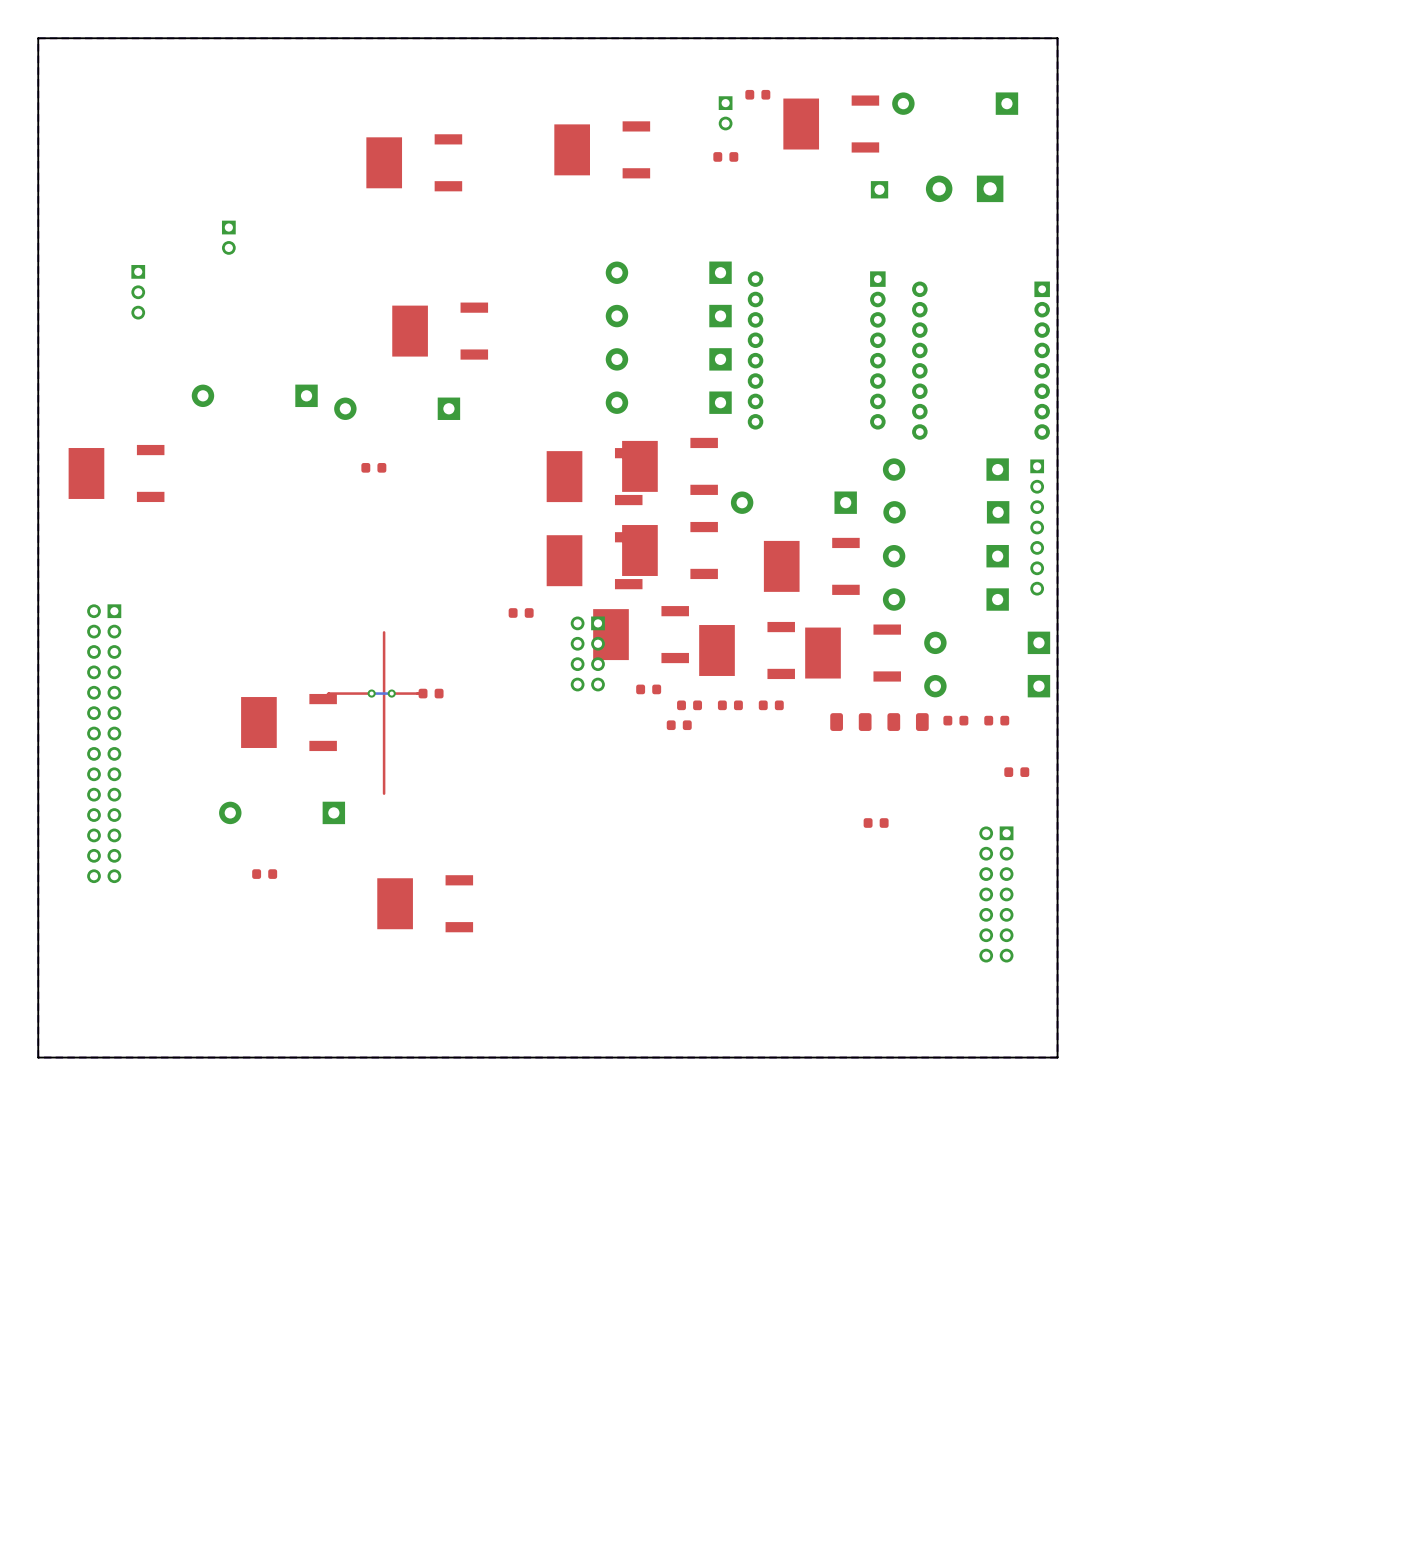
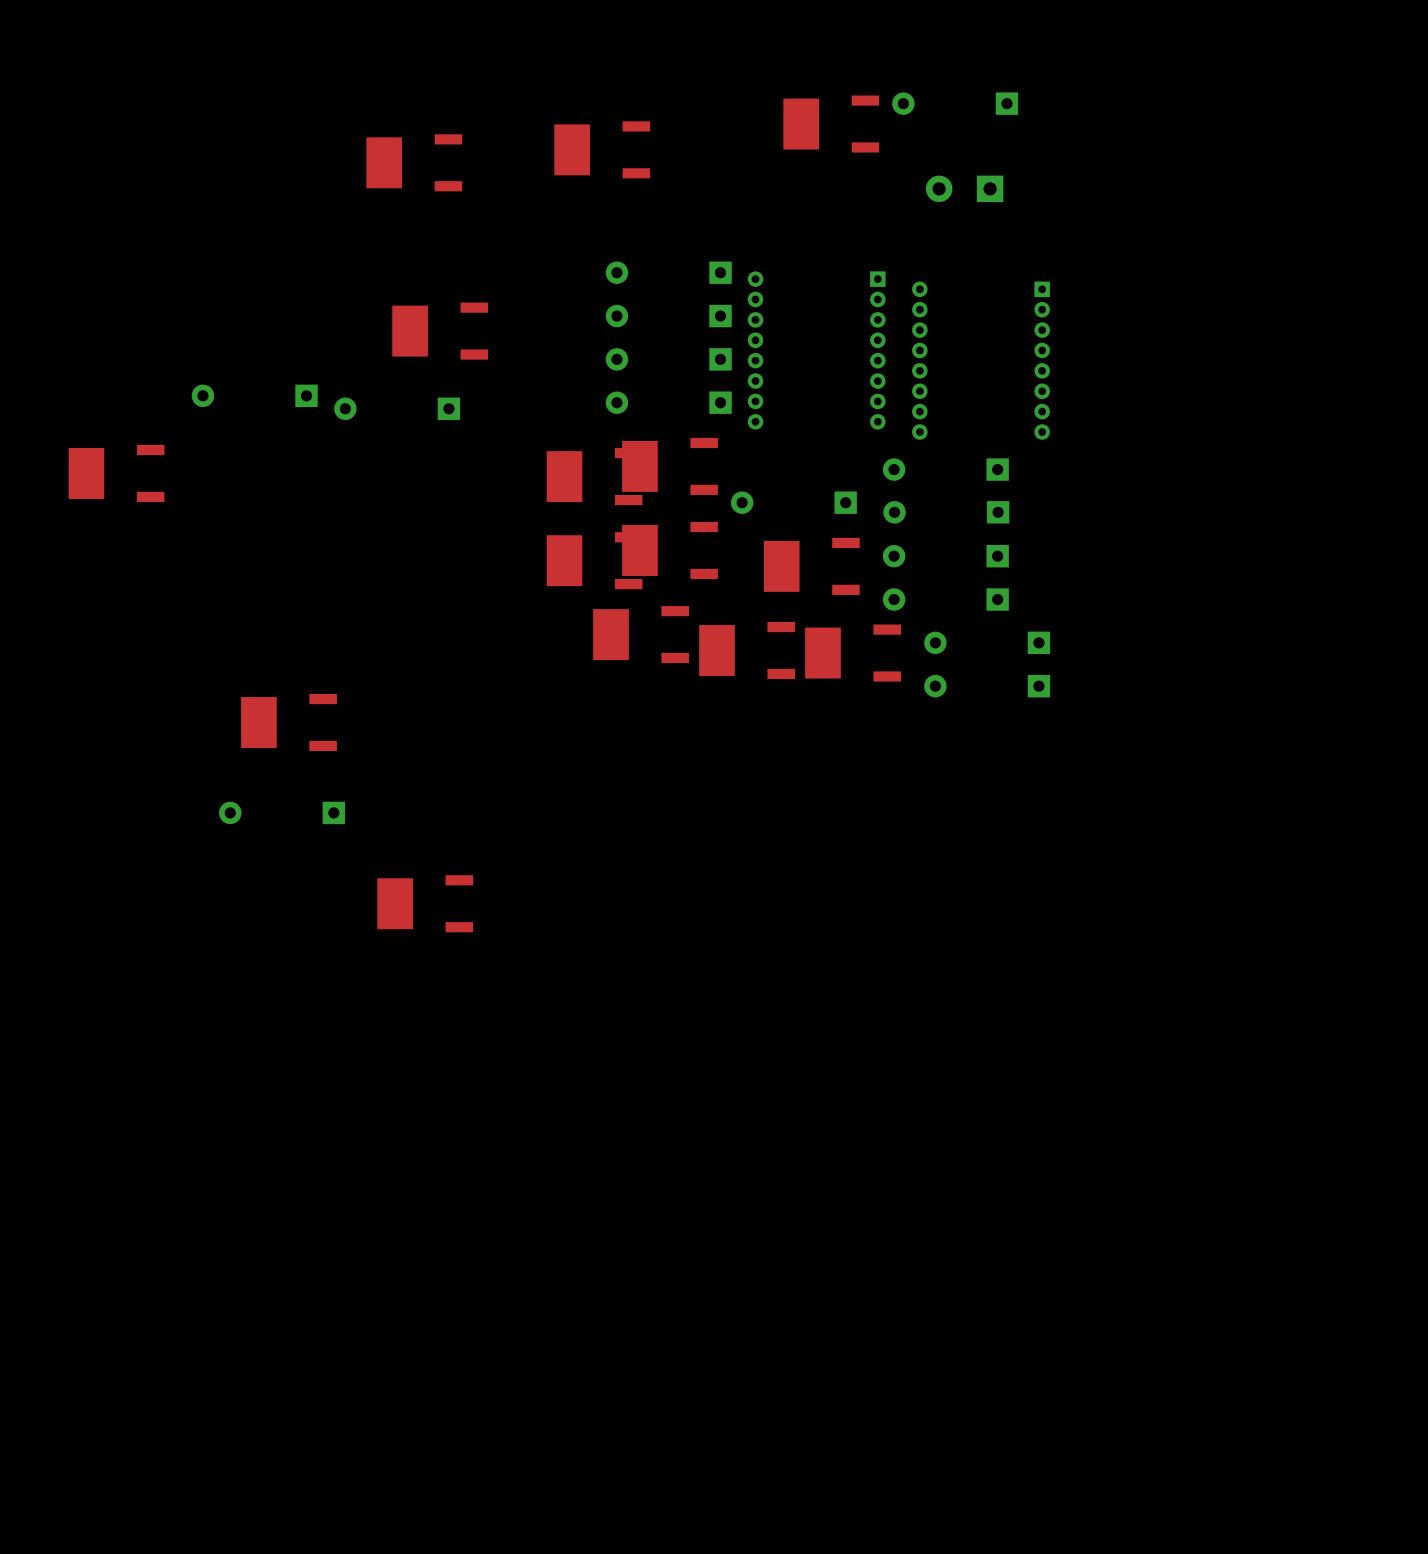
board edge: (1057, 38) (1057, 1057) (38, 1057) (38, 38) (1057, 38) -> none
part: (757, 94) -> none
part: (725, 113) -> none
part: (725, 156) -> none
part: (879, 189) -> none
part: (228, 237) -> none
part: (138, 292) -> none
part: (373, 467) -> none
part: (1037, 527) -> none
part: (521, 612) -> none
top track: (384, 632) (384, 793) -> none
part: (587, 653) -> none
part: (648, 689) -> none
top track: (371, 693) (328, 693) (323, 699) -> none
via: (371, 693) -> none
bottom track: (391, 693) (371, 693) -> none
via: (391, 693) -> none
top track: (423, 693) (391, 693) -> none
part: (431, 693) -> none
part: (689, 705) -> none
part: (730, 705) -> none
part: (771, 705) -> none
part: (955, 720) -> none
part: (996, 720) -> none
part: (850, 722) -> none
part: (908, 722) -> none
part: (679, 725) -> none
part: (104, 743) -> none
part: (1016, 772) -> none
part: (876, 823) -> none
part: (264, 874) -> none
part: (996, 894) -> none

